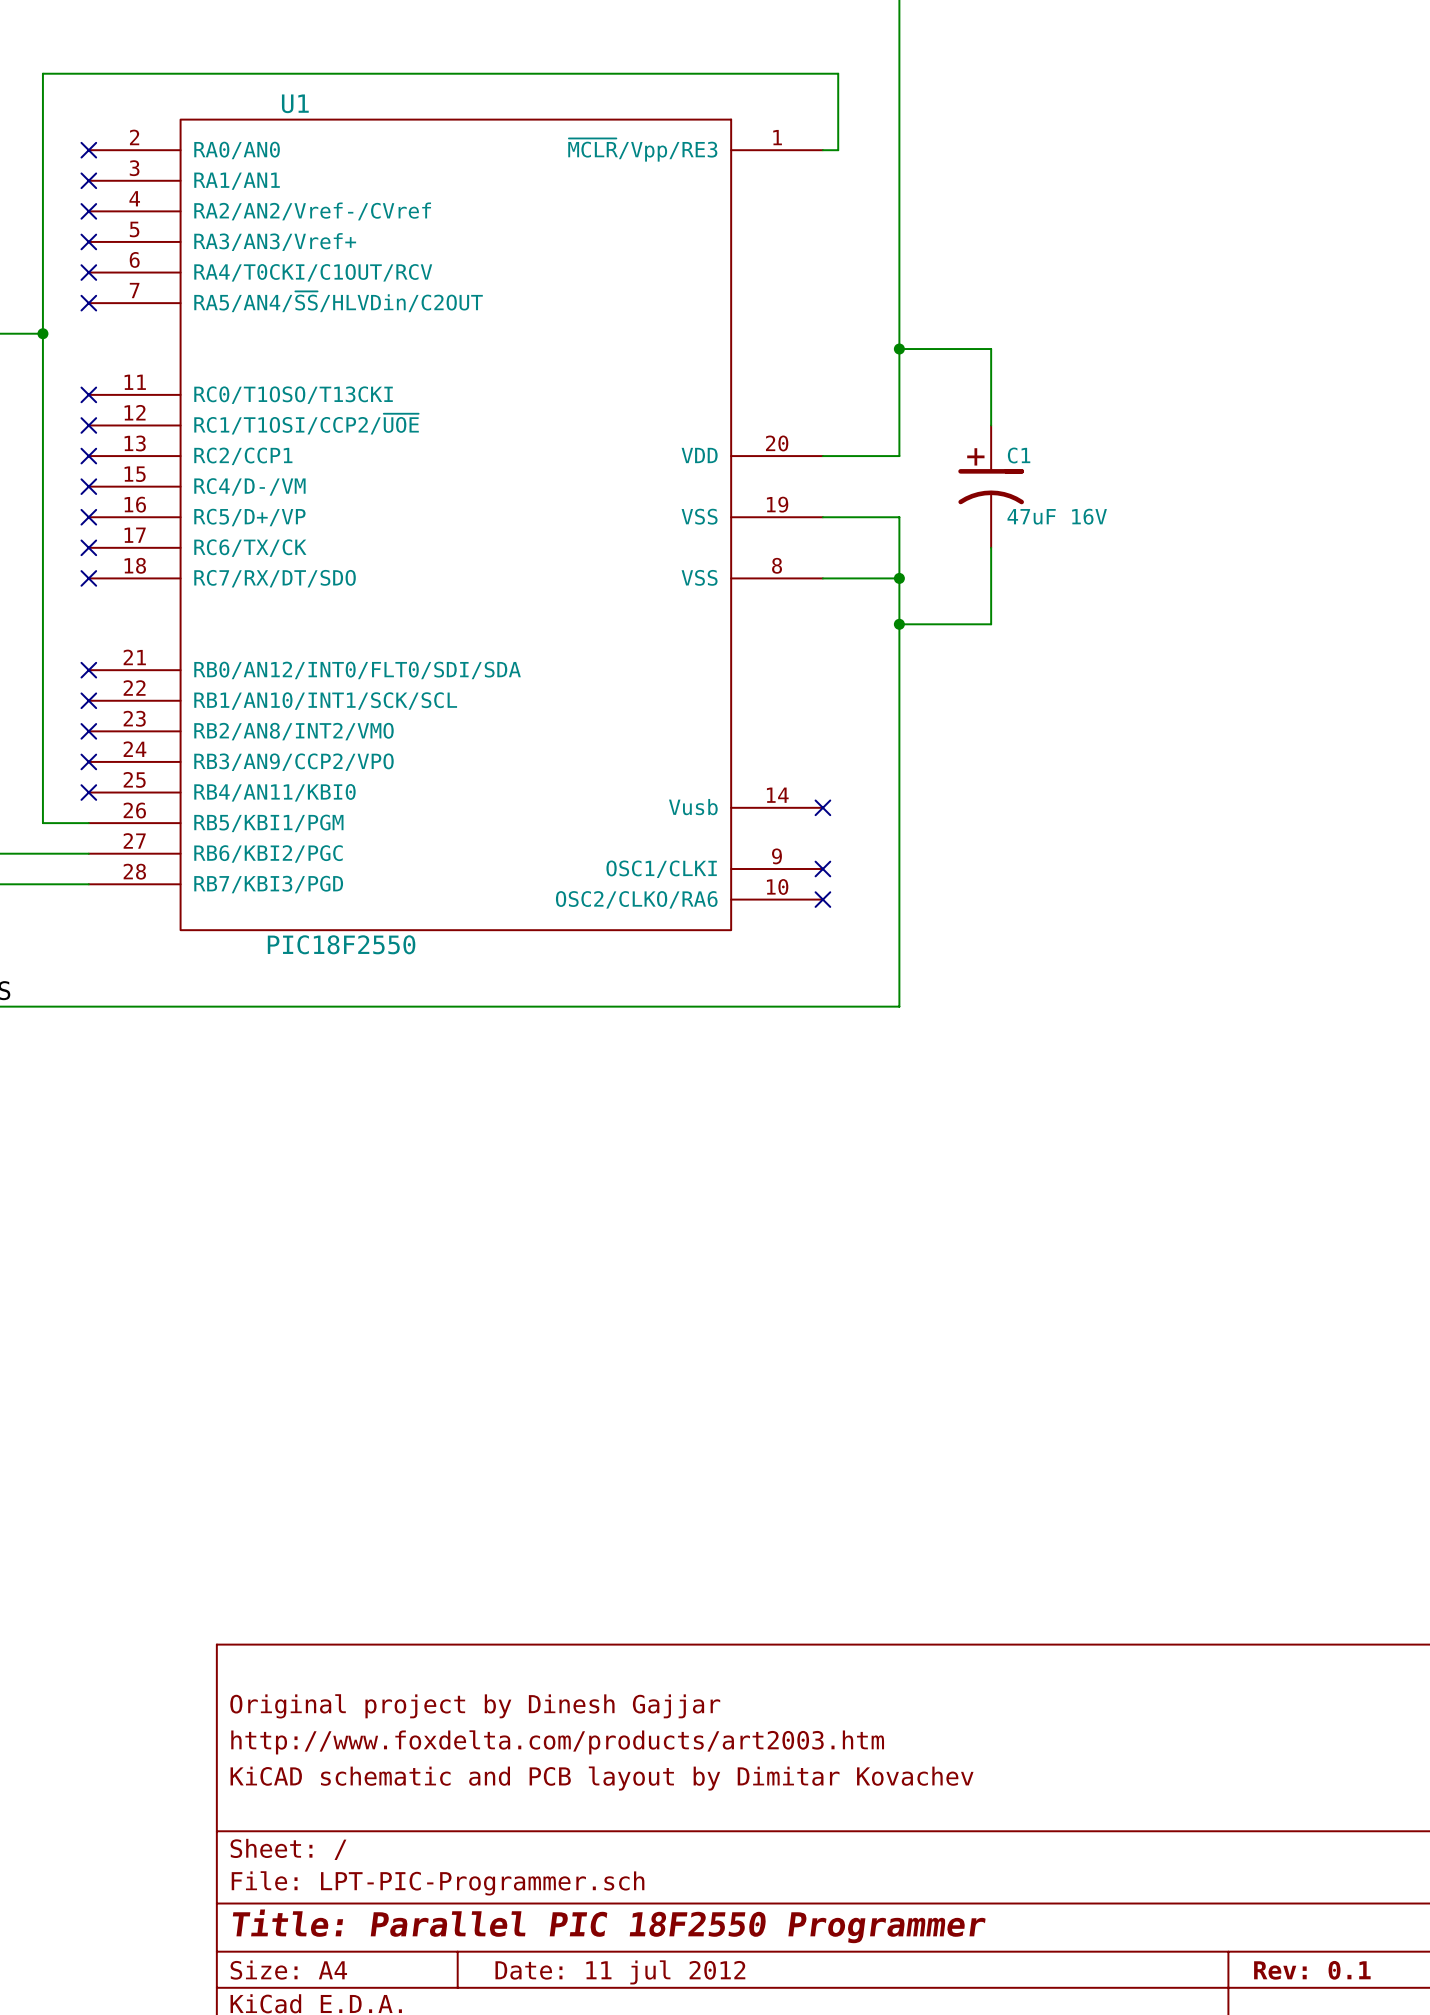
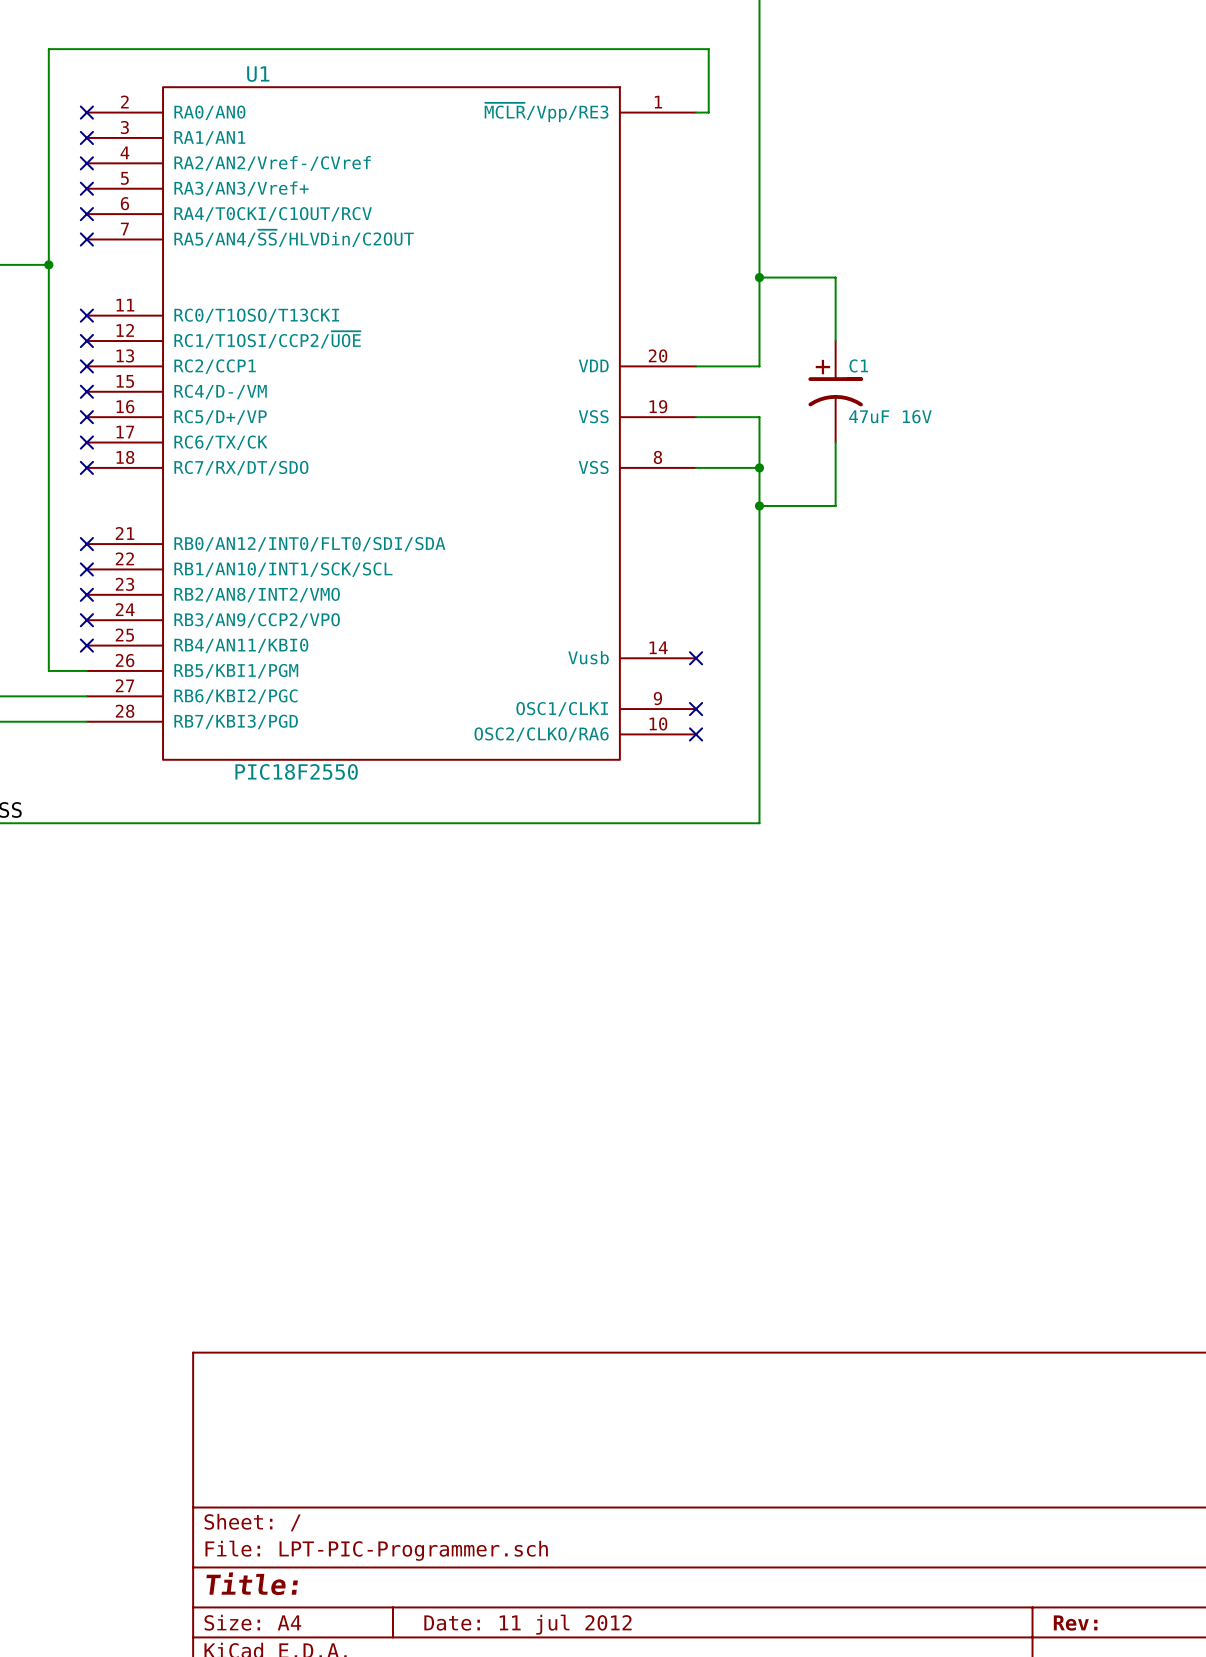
title block: Original project by Dinesh Gajjar (475, 1706) -> none
title block: http://www.foxdelta.com/products/art2003.htm (557, 1742) -> none
title block: KiCAD schematic and PCB layout by Dimitar Kovachev (602, 1778) -> none
title block: Title: Parallel PIC 18F2550 Programmer (609, 1926) -> Title: (252, 1583)
title block: Rev: 0.1 (1312, 1970) -> Rev: (1075, 1623)

